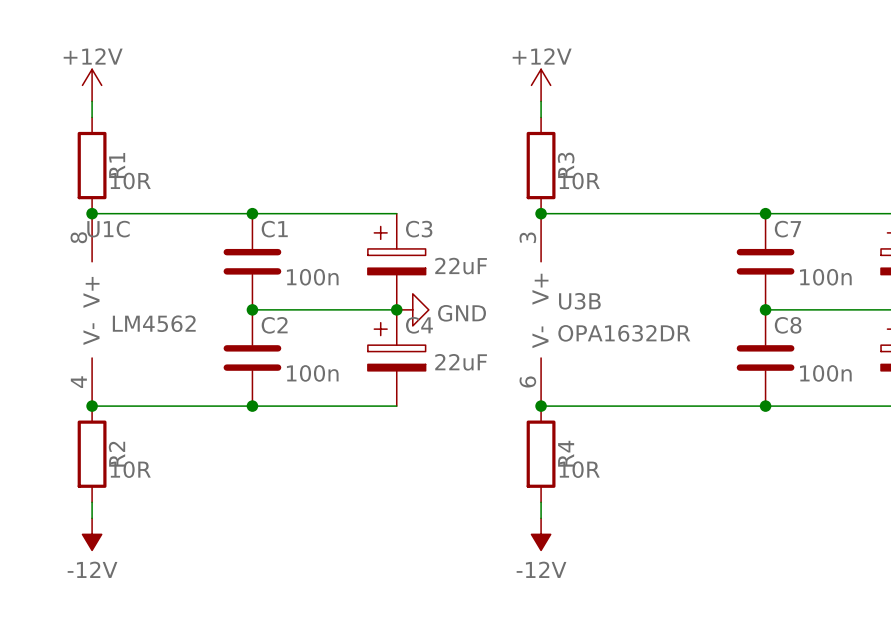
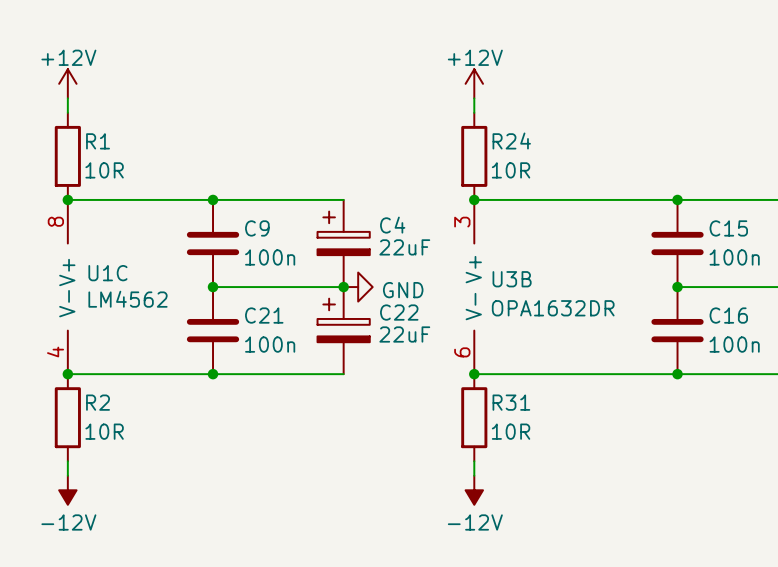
R1 name rotation: 0° (117, 165) -> 90° clockwise (98, 141)
R3 name: R3 (566, 165) -> R24 (511, 141)
U1C name position: U1C (108, 229) -> U1C (107, 273)
C1 name: C1 (274, 229) -> C9 (257, 228)
C3 name: C3 (419, 229) -> C4 (392, 225)
C7 name: C7 (787, 229) -> C15 (728, 228)
C2 name: C2 (274, 325) -> C21 (264, 315)
C4 name: C4 (419, 325) -> C22 (399, 312)
C8 name: C8 (788, 325) -> C16 (728, 315)
R4 name: R4 (566, 453) -> R31 (511, 402)
R2 name rotation: 0° (116, 454) -> 90° clockwise (98, 402)

